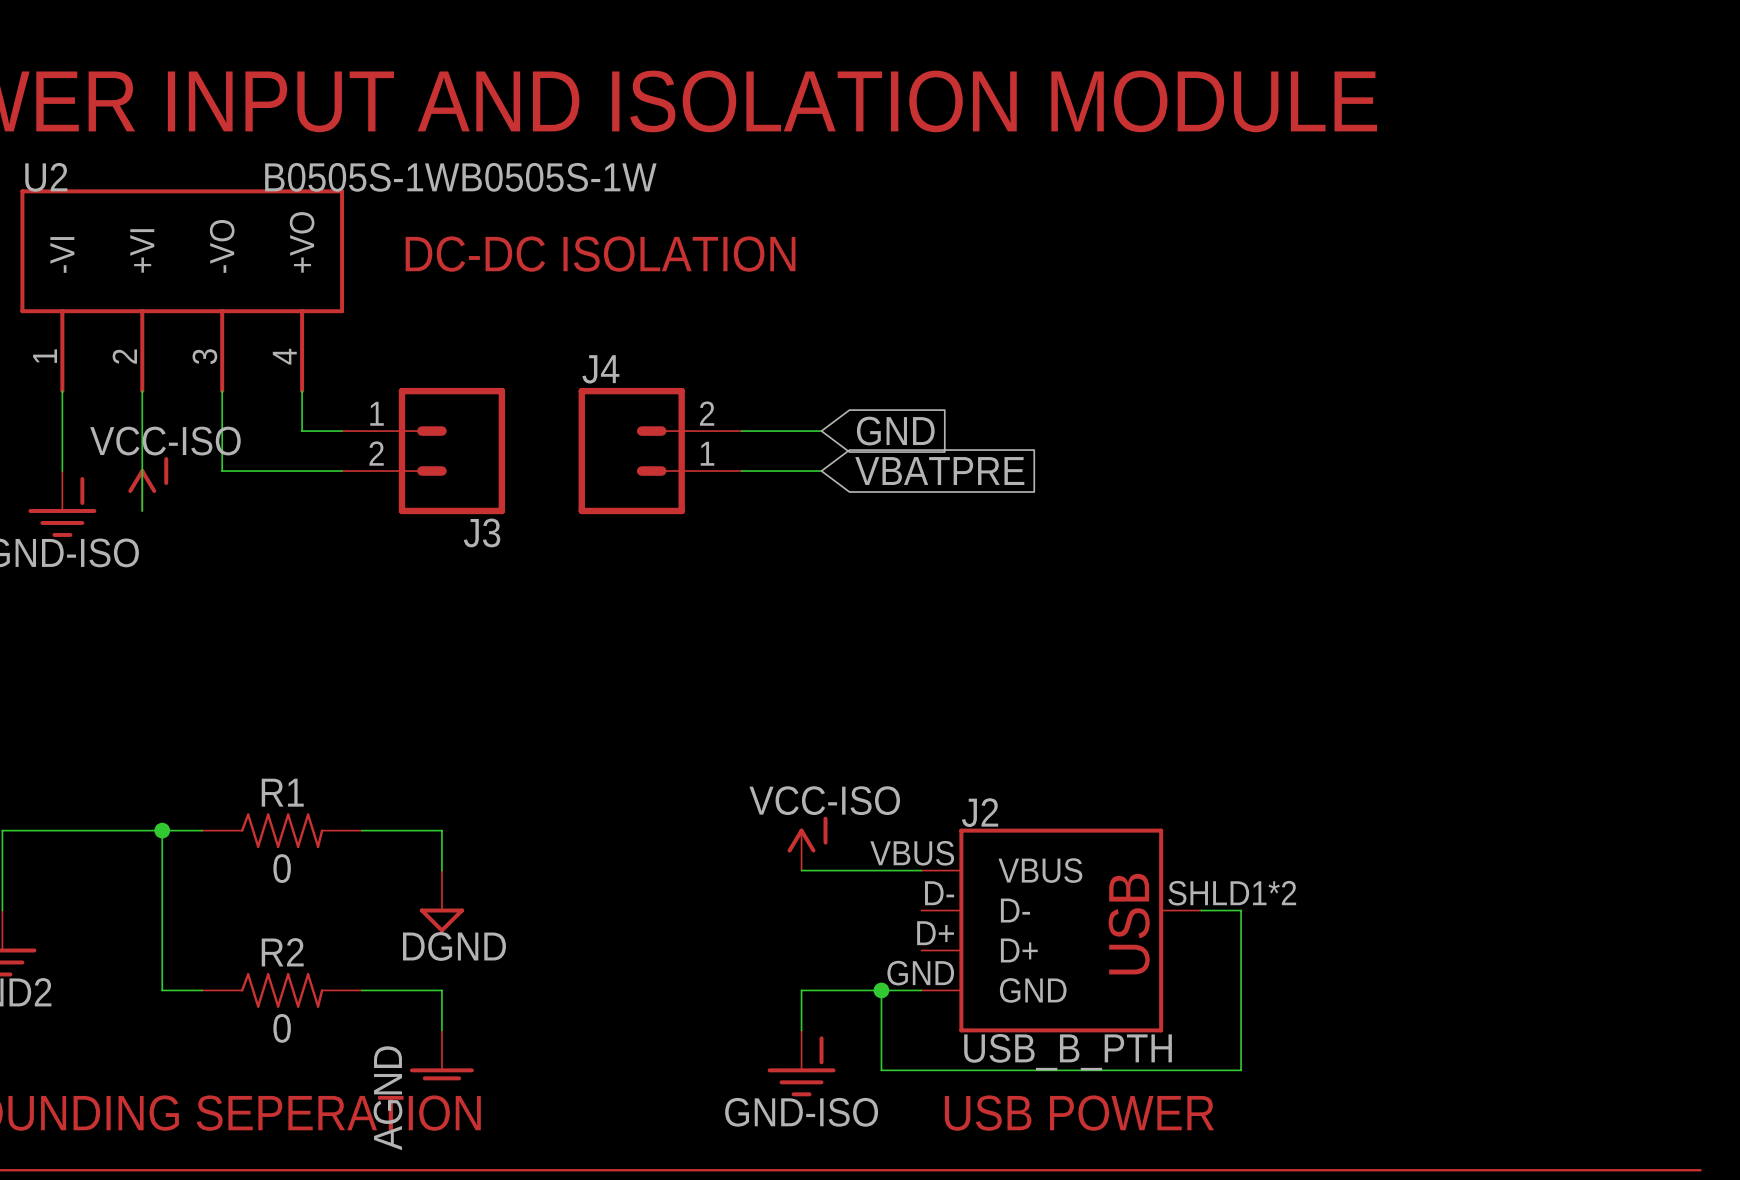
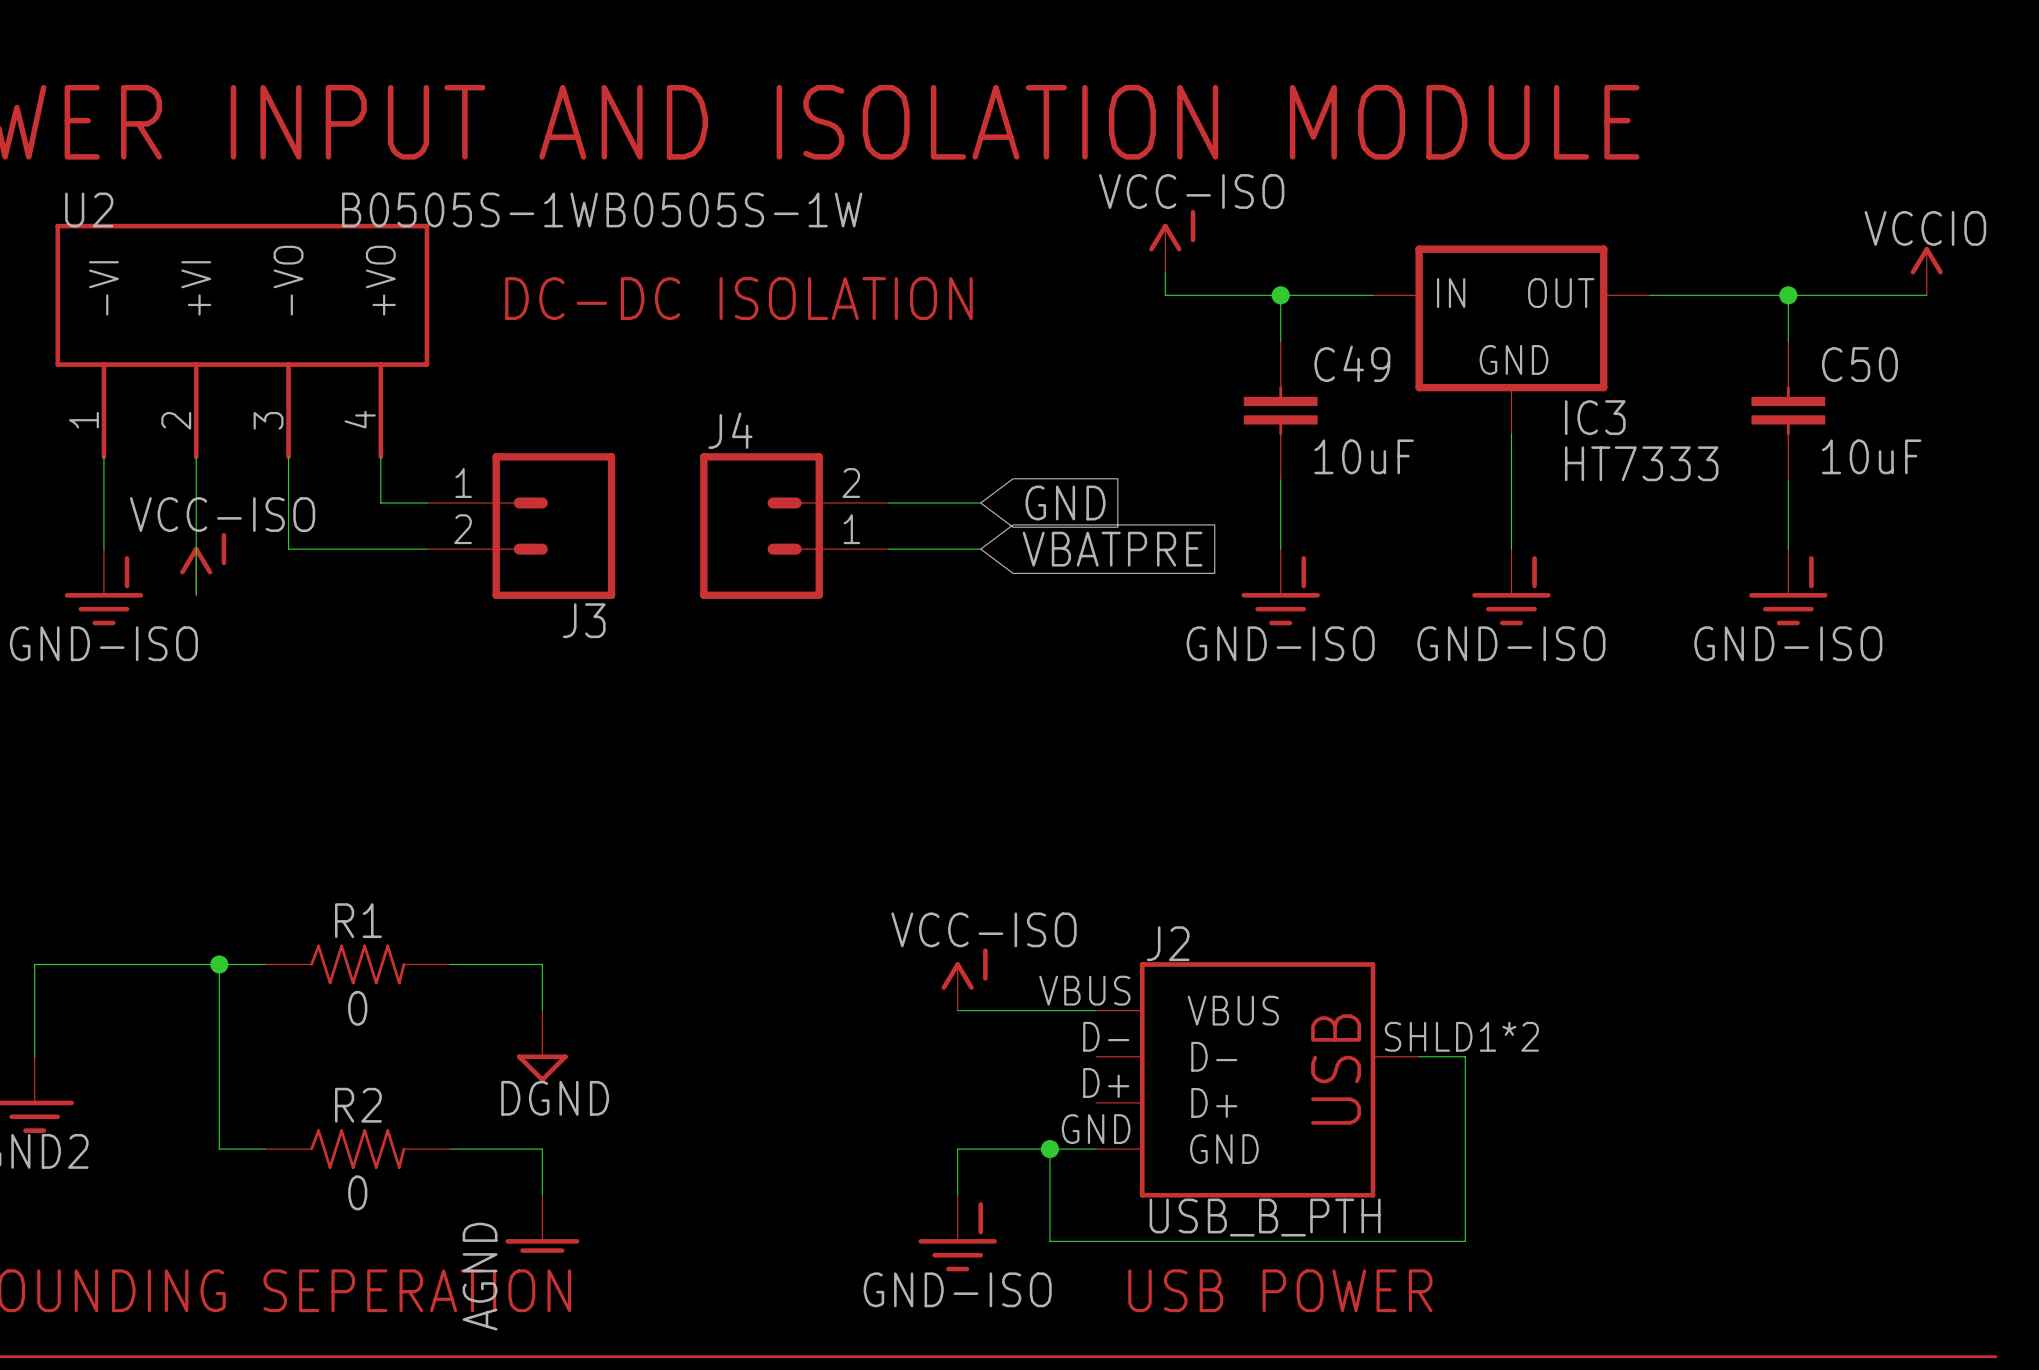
power symbol: none -> VCC-ISO (1172, 241)
power symbol: none -> VCCIO (1926, 271)
wire: none -> (1165, 272) (1165, 295) (1373, 295)
wire: none -> (1280, 295) (1280, 341)
junction: none -> (1280, 295)
wire: none -> (1649, 295) (1926, 295)
wire: none -> (1788, 295) (1788, 341)
junction: none -> (1788, 295)
IC3: none -> HT7333 (1511, 339)
C49: none -> 10uF (1280, 410)
C50: none -> 10uF (1788, 410)
wire: none -> (1511, 433) (1511, 549)
wire: none -> (1280, 479) (1280, 549)
wire: none -> (1788, 479) (1788, 549)
power symbol: none -> GND-ISO (1280, 587)
power symbol: none -> GND-ISO (1511, 587)
power symbol: none -> GND-ISO (1788, 587)

